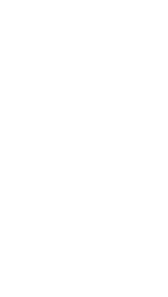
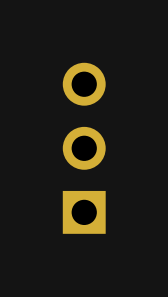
part: none -> (84, 148)

